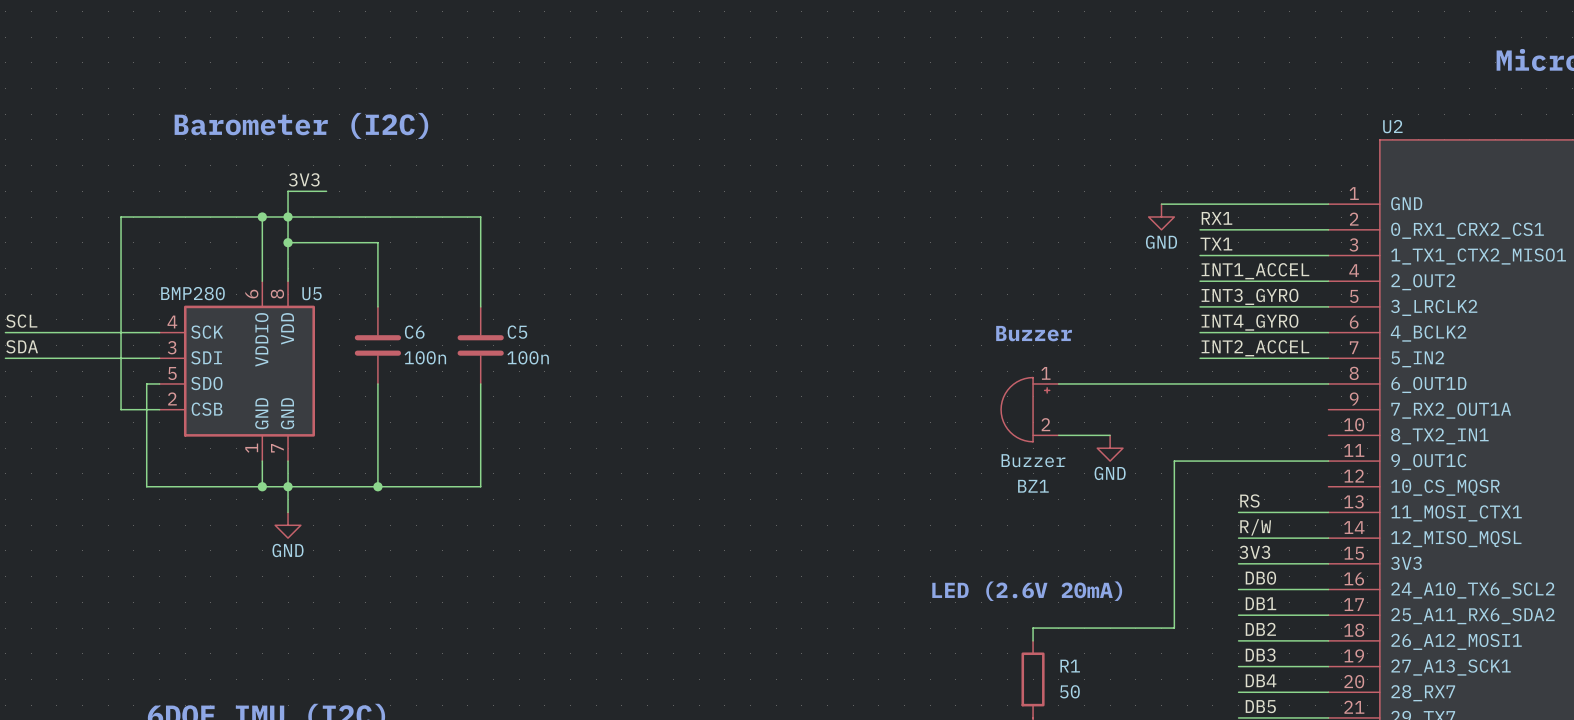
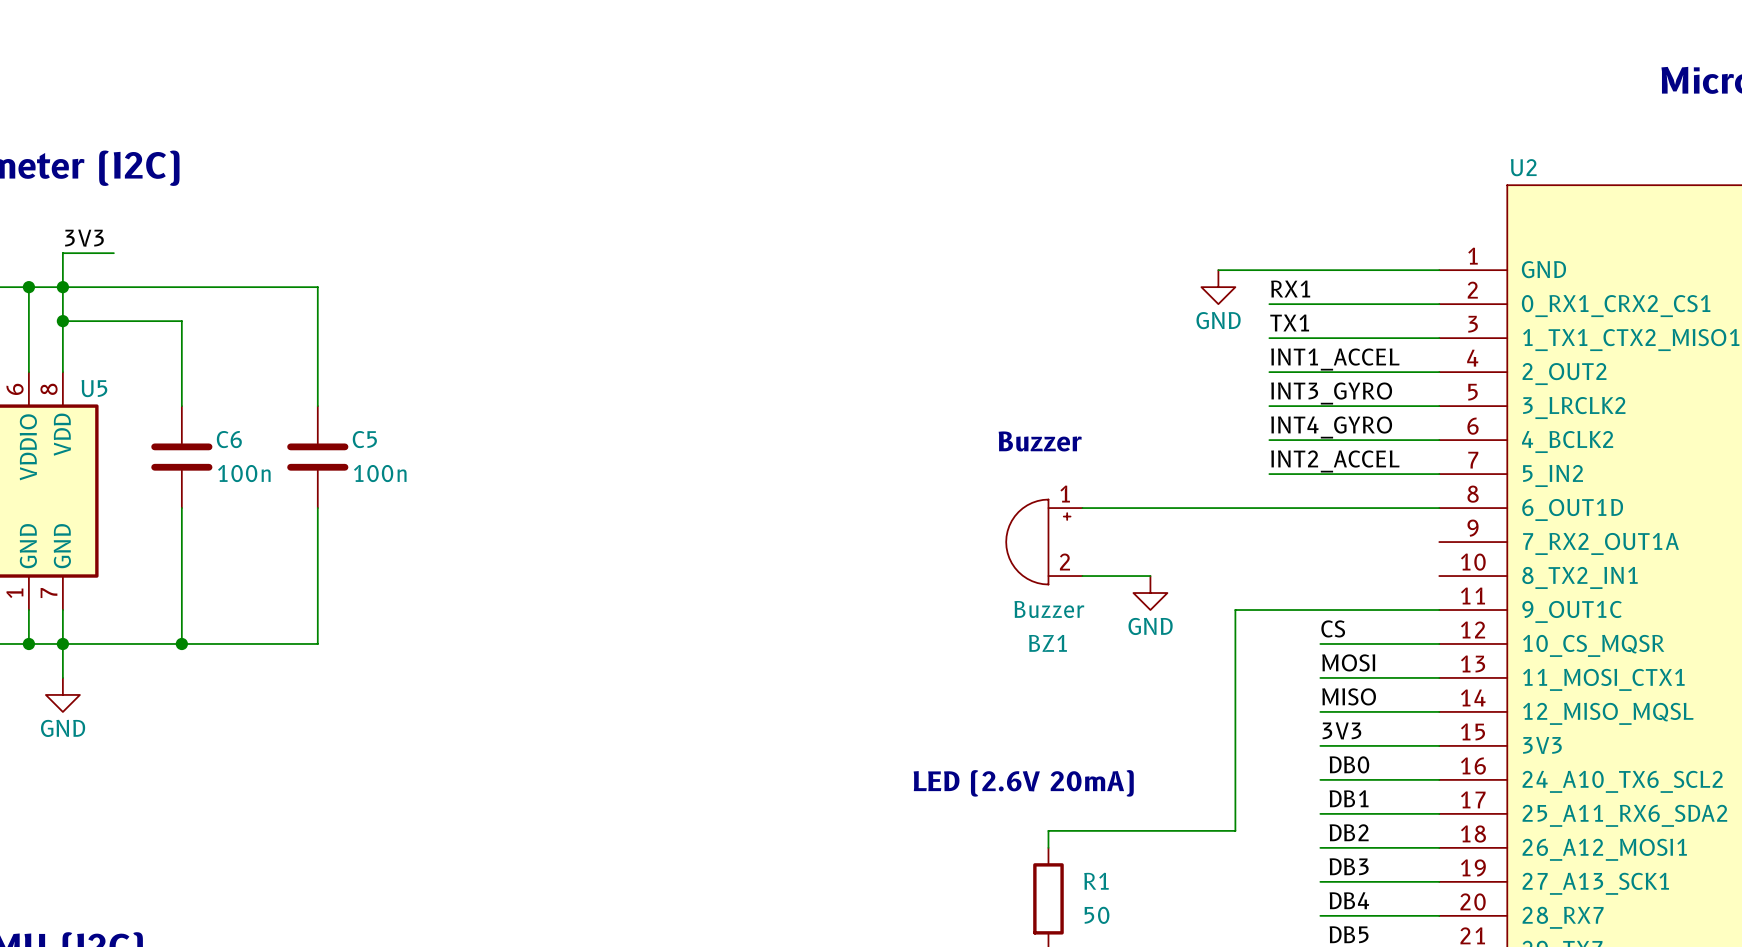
label: none -> CS (1333, 628)
wire: none -> (1320, 643) (1439, 643)
label: RS (1249, 500) -> MOSI (1348, 662)
label: R/W (1255, 527) -> MISO (1349, 696)

